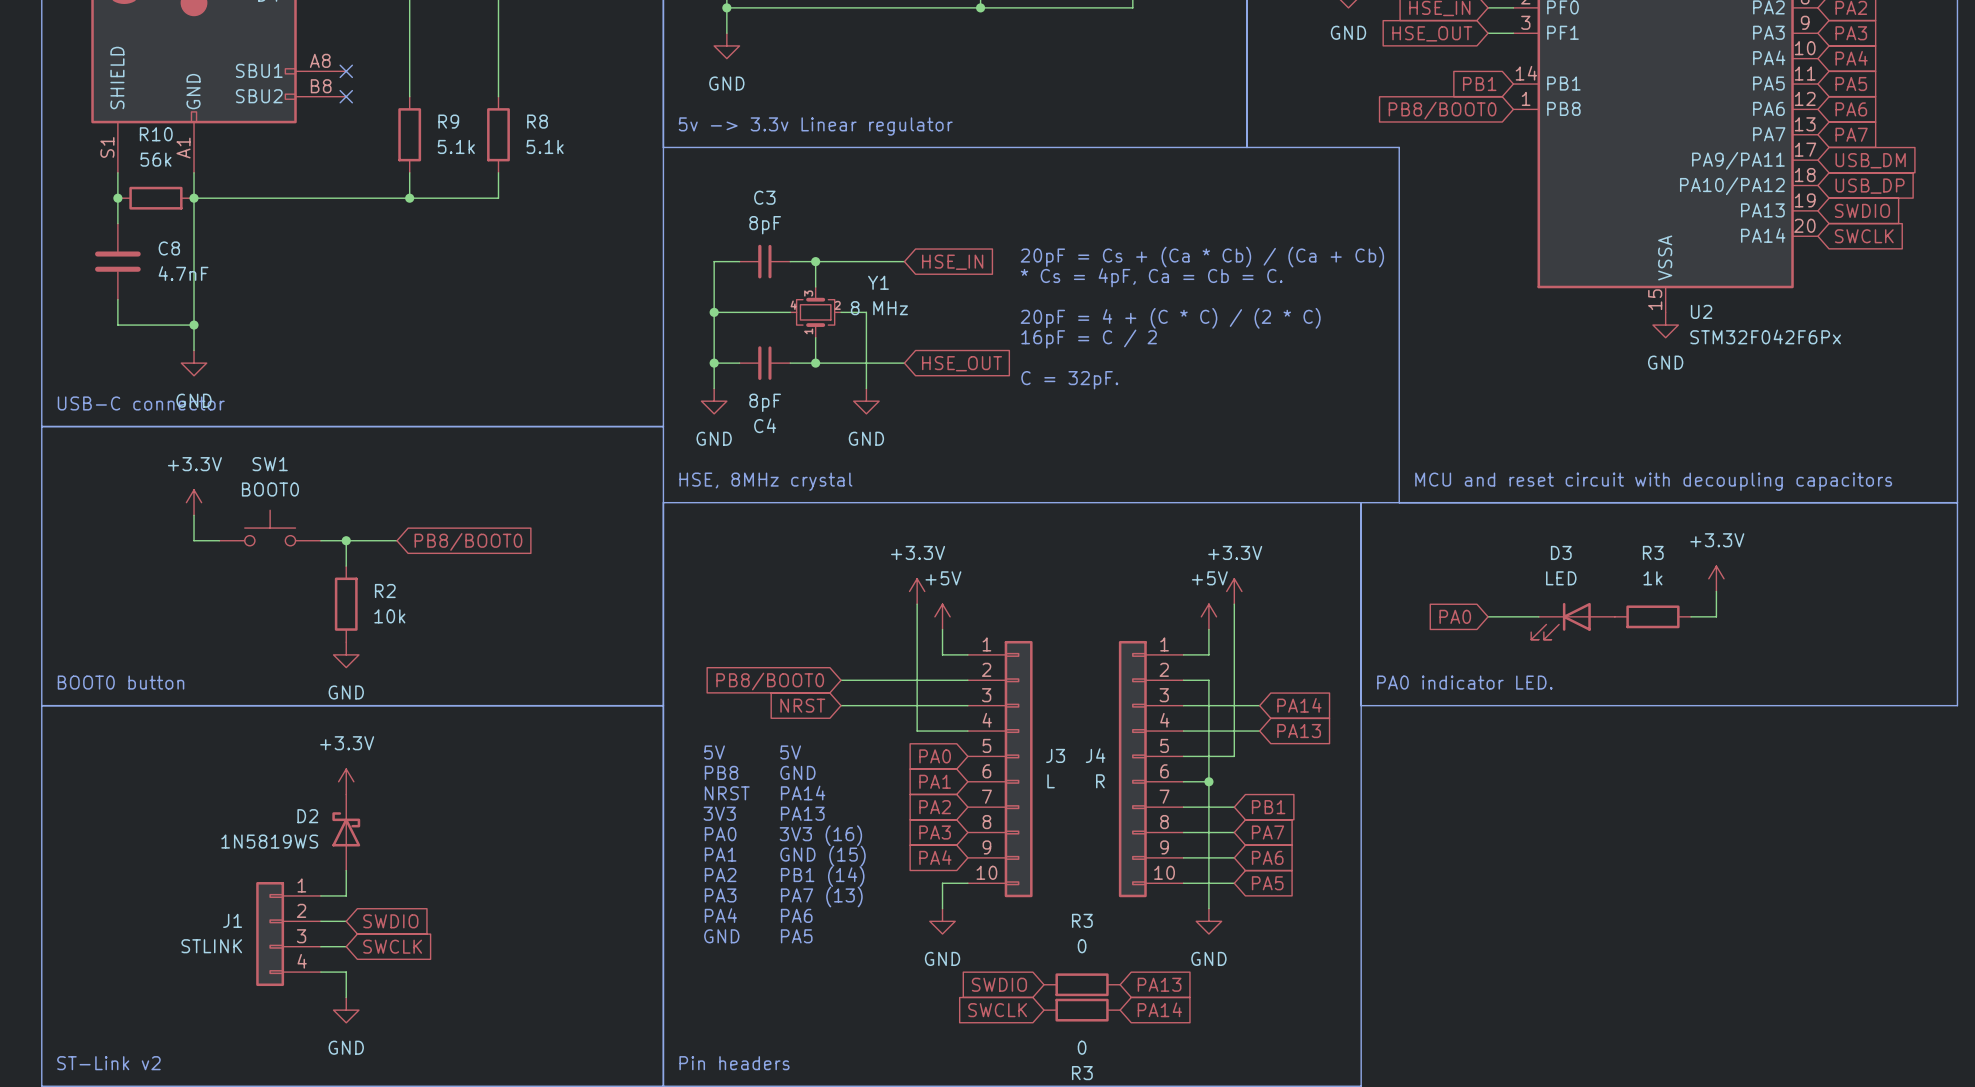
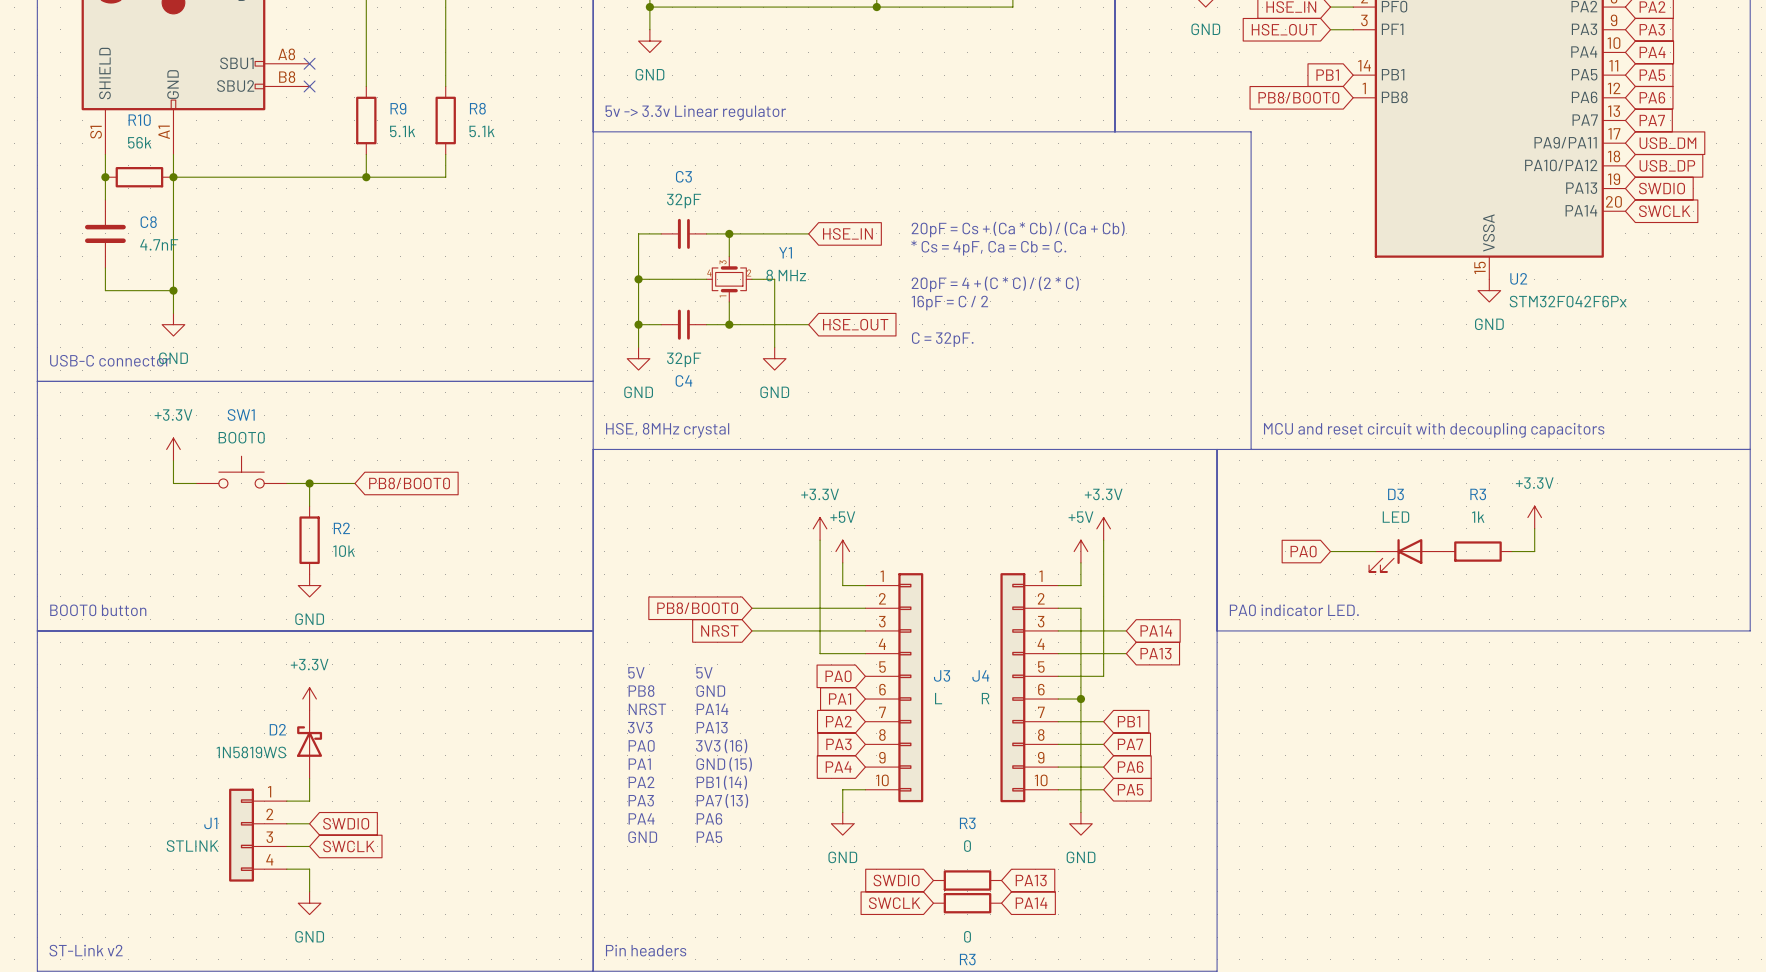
C3 value: 8pF (765, 225) -> 32pF (684, 200)
C4 value: 8pF (765, 402) -> 32pF (684, 359)

